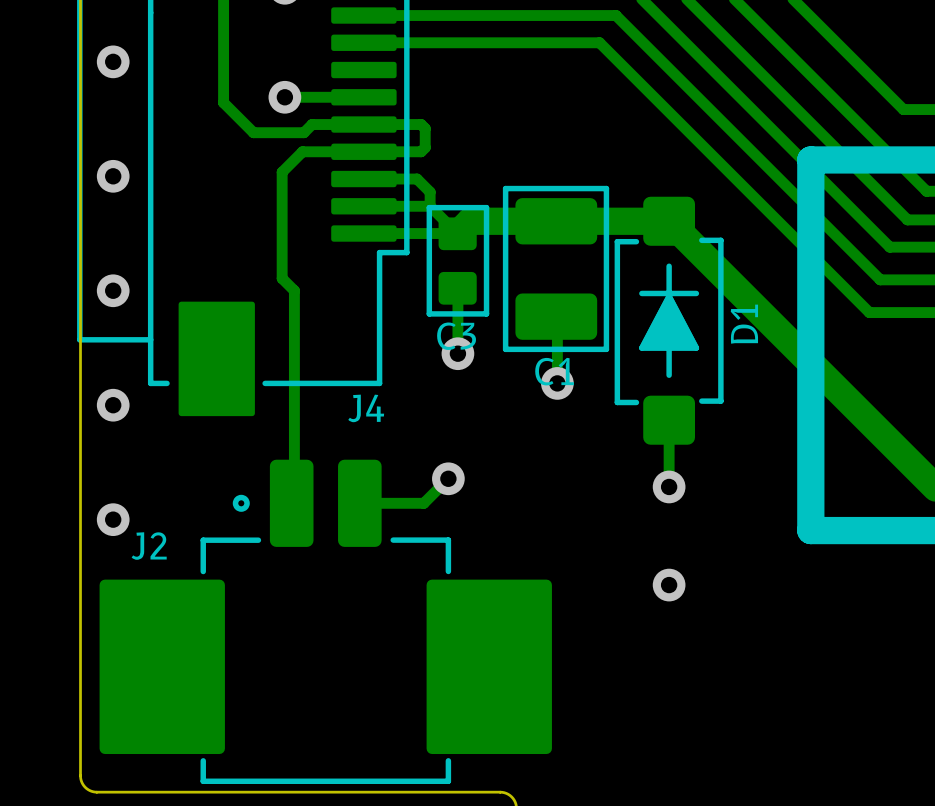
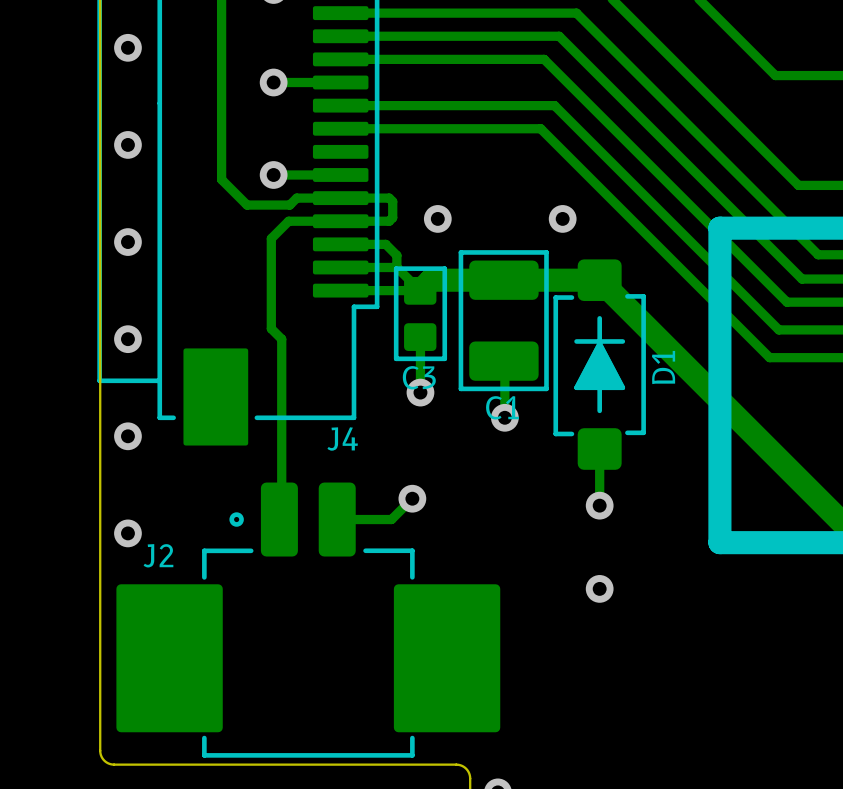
via: none -> (437, 218)
via: none -> (562, 218)

